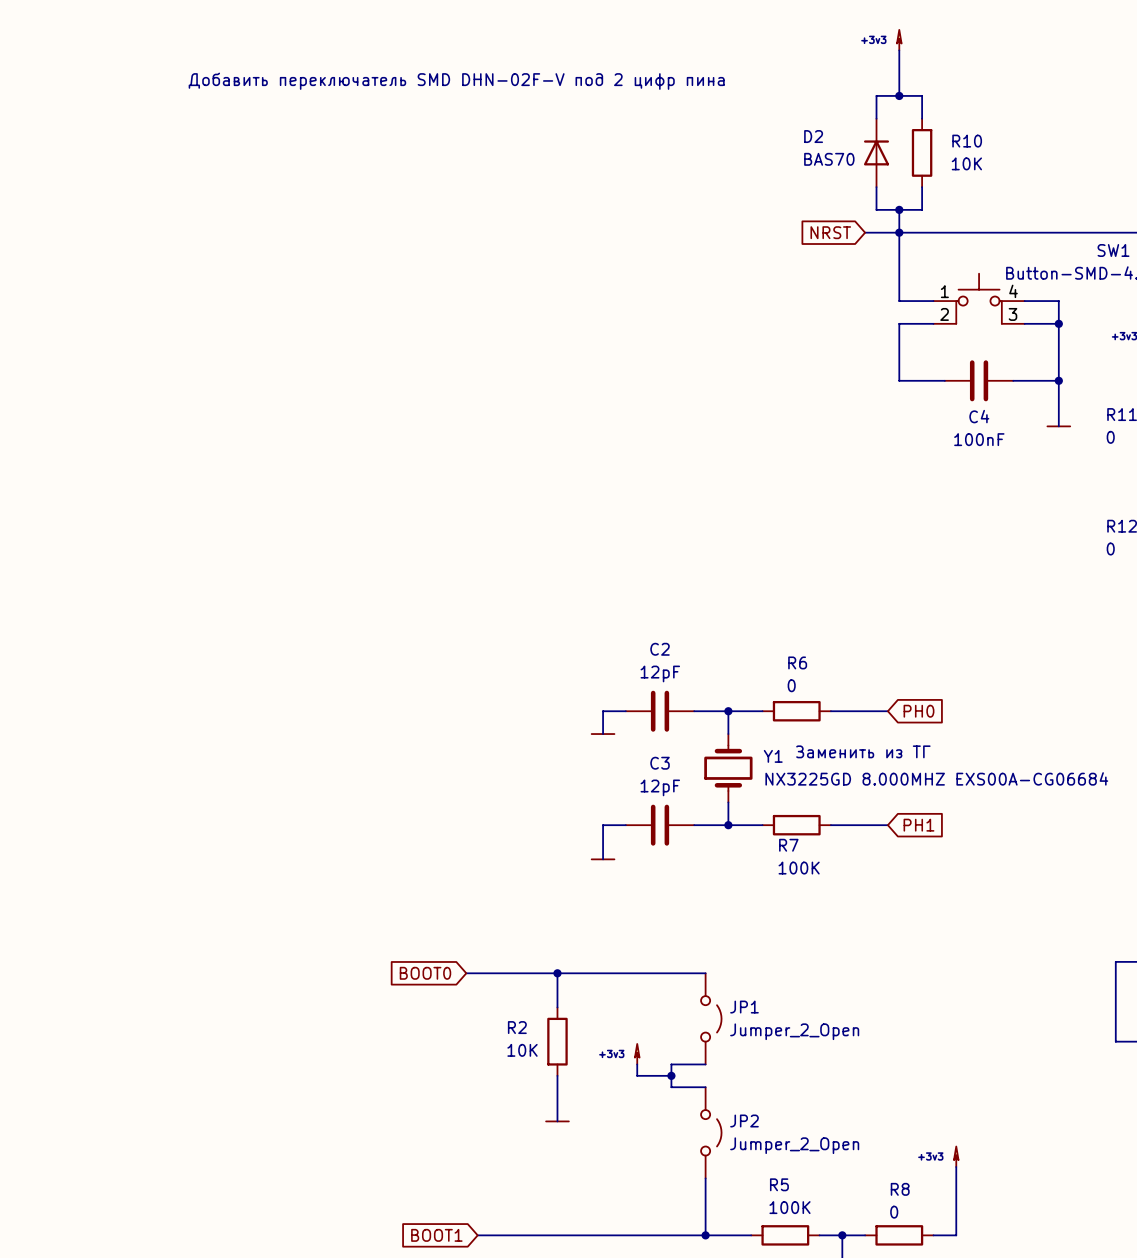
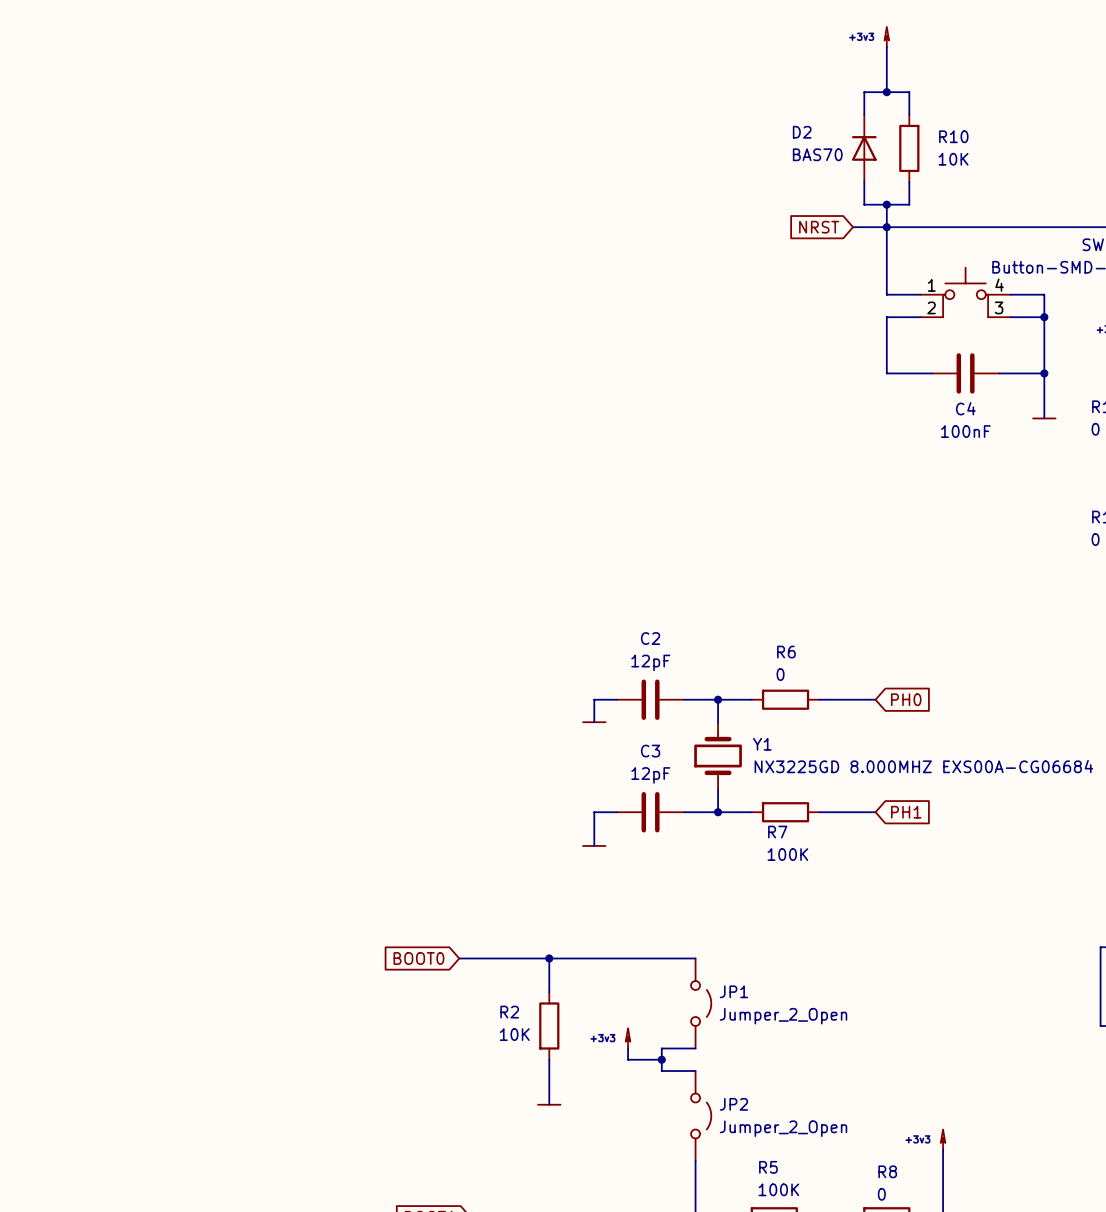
text: Добавить переключатель SMD DHN-02F-V под 2 цифр пина (456, 81) -> none
text: Заменить из ТГ (863, 751) -> none

